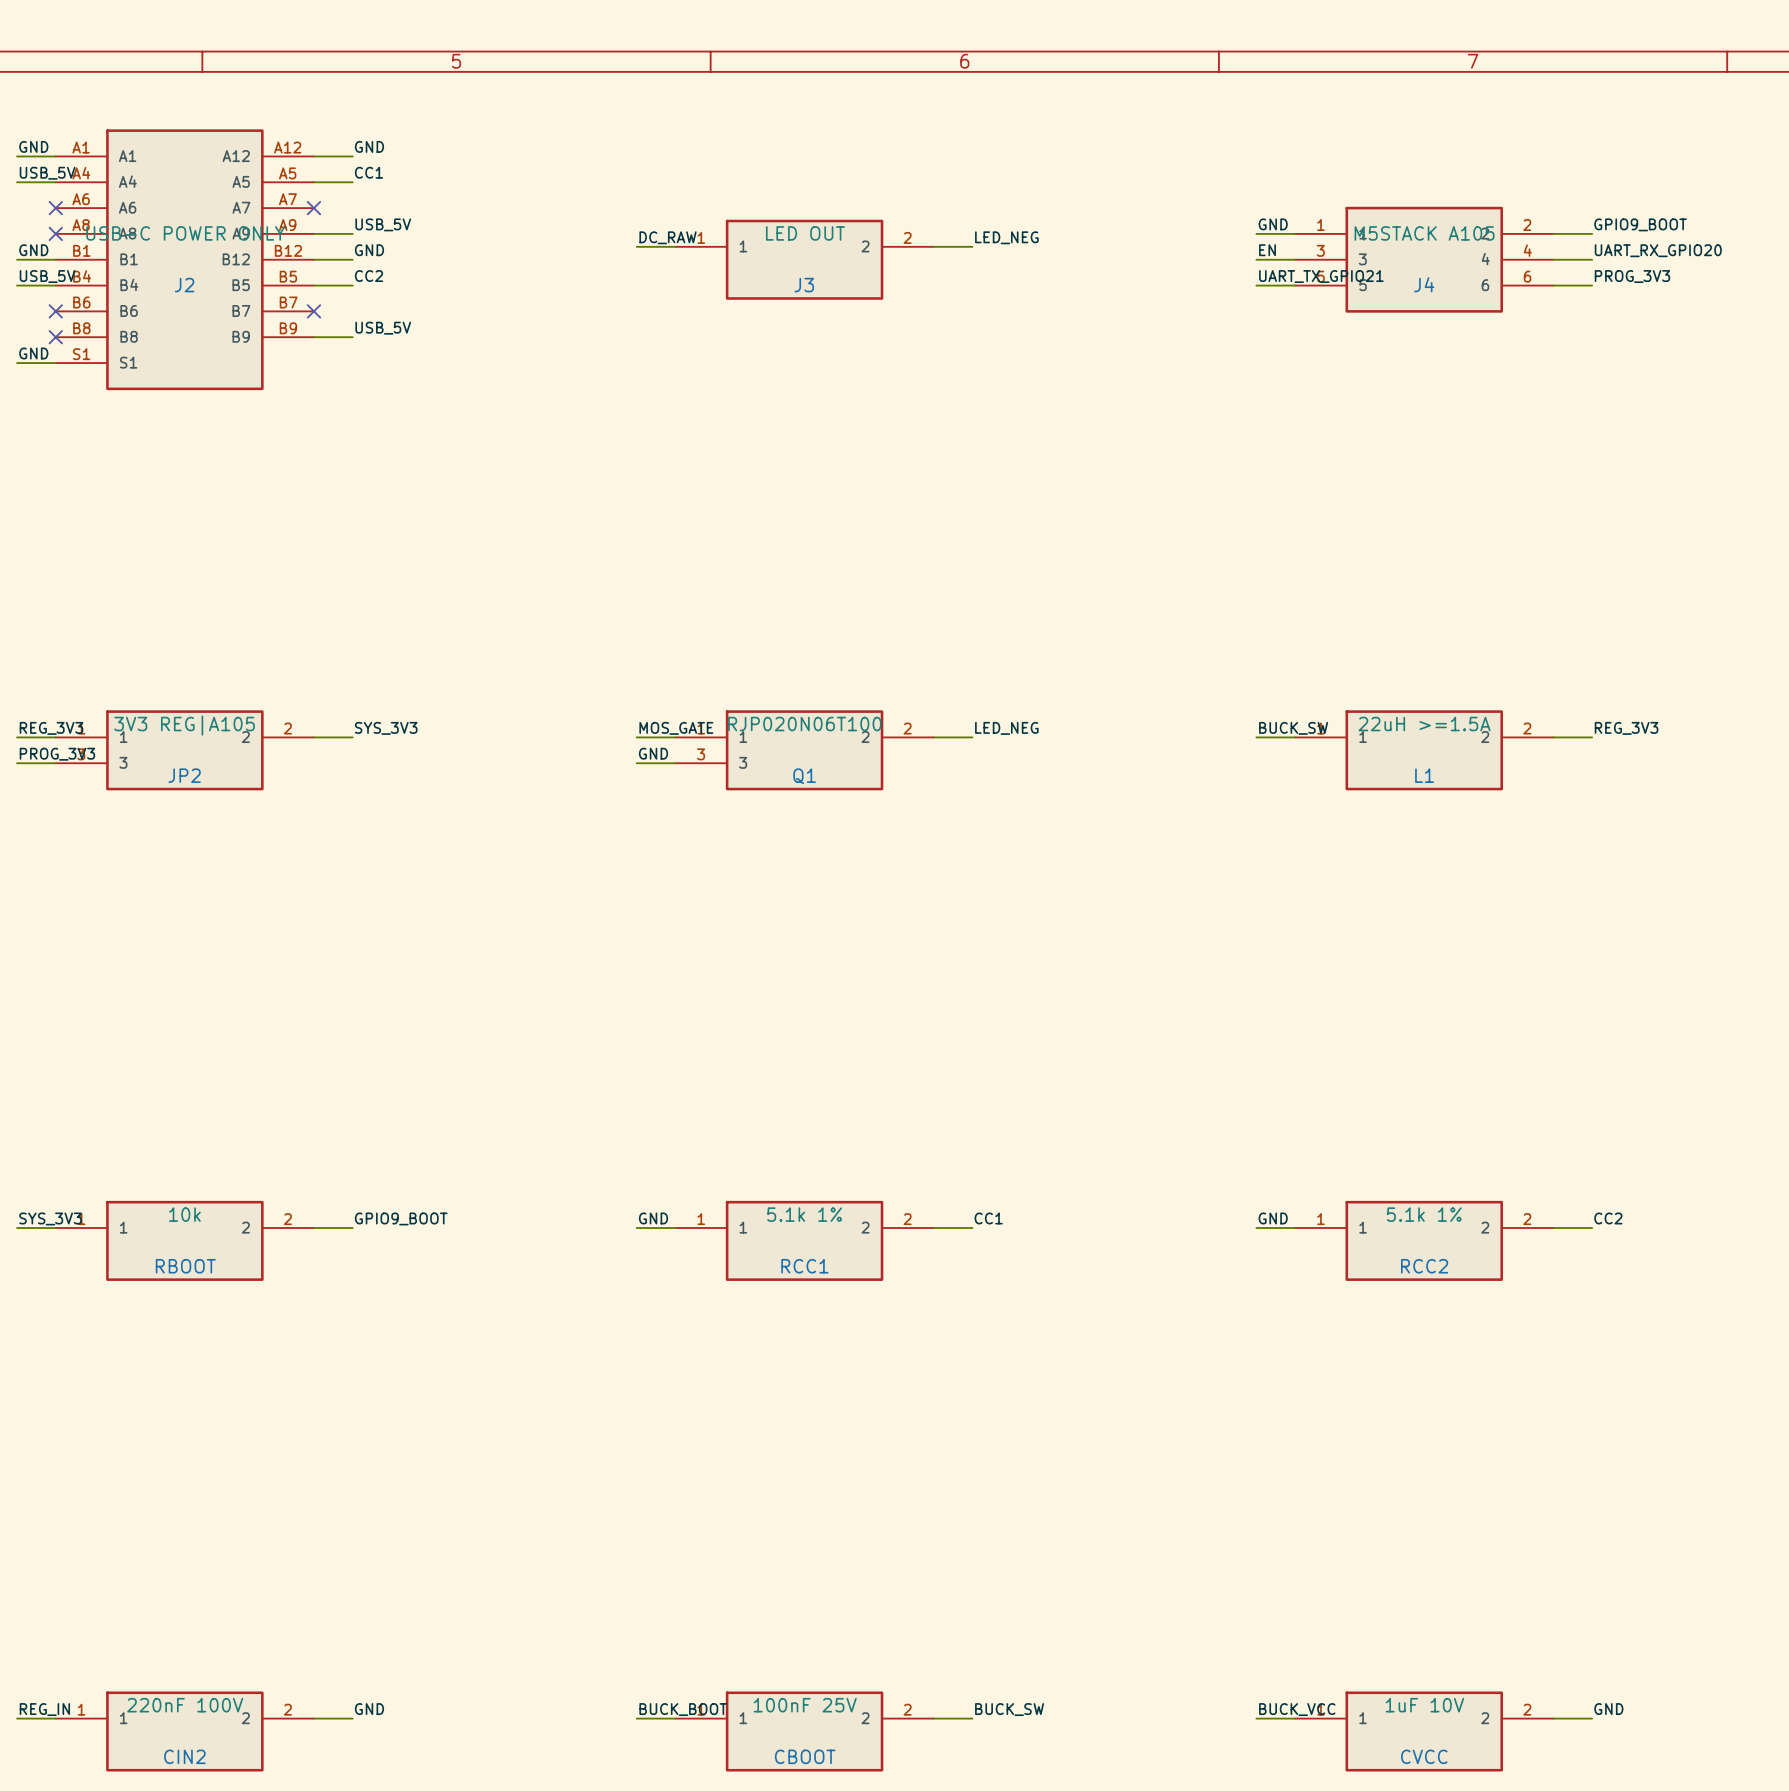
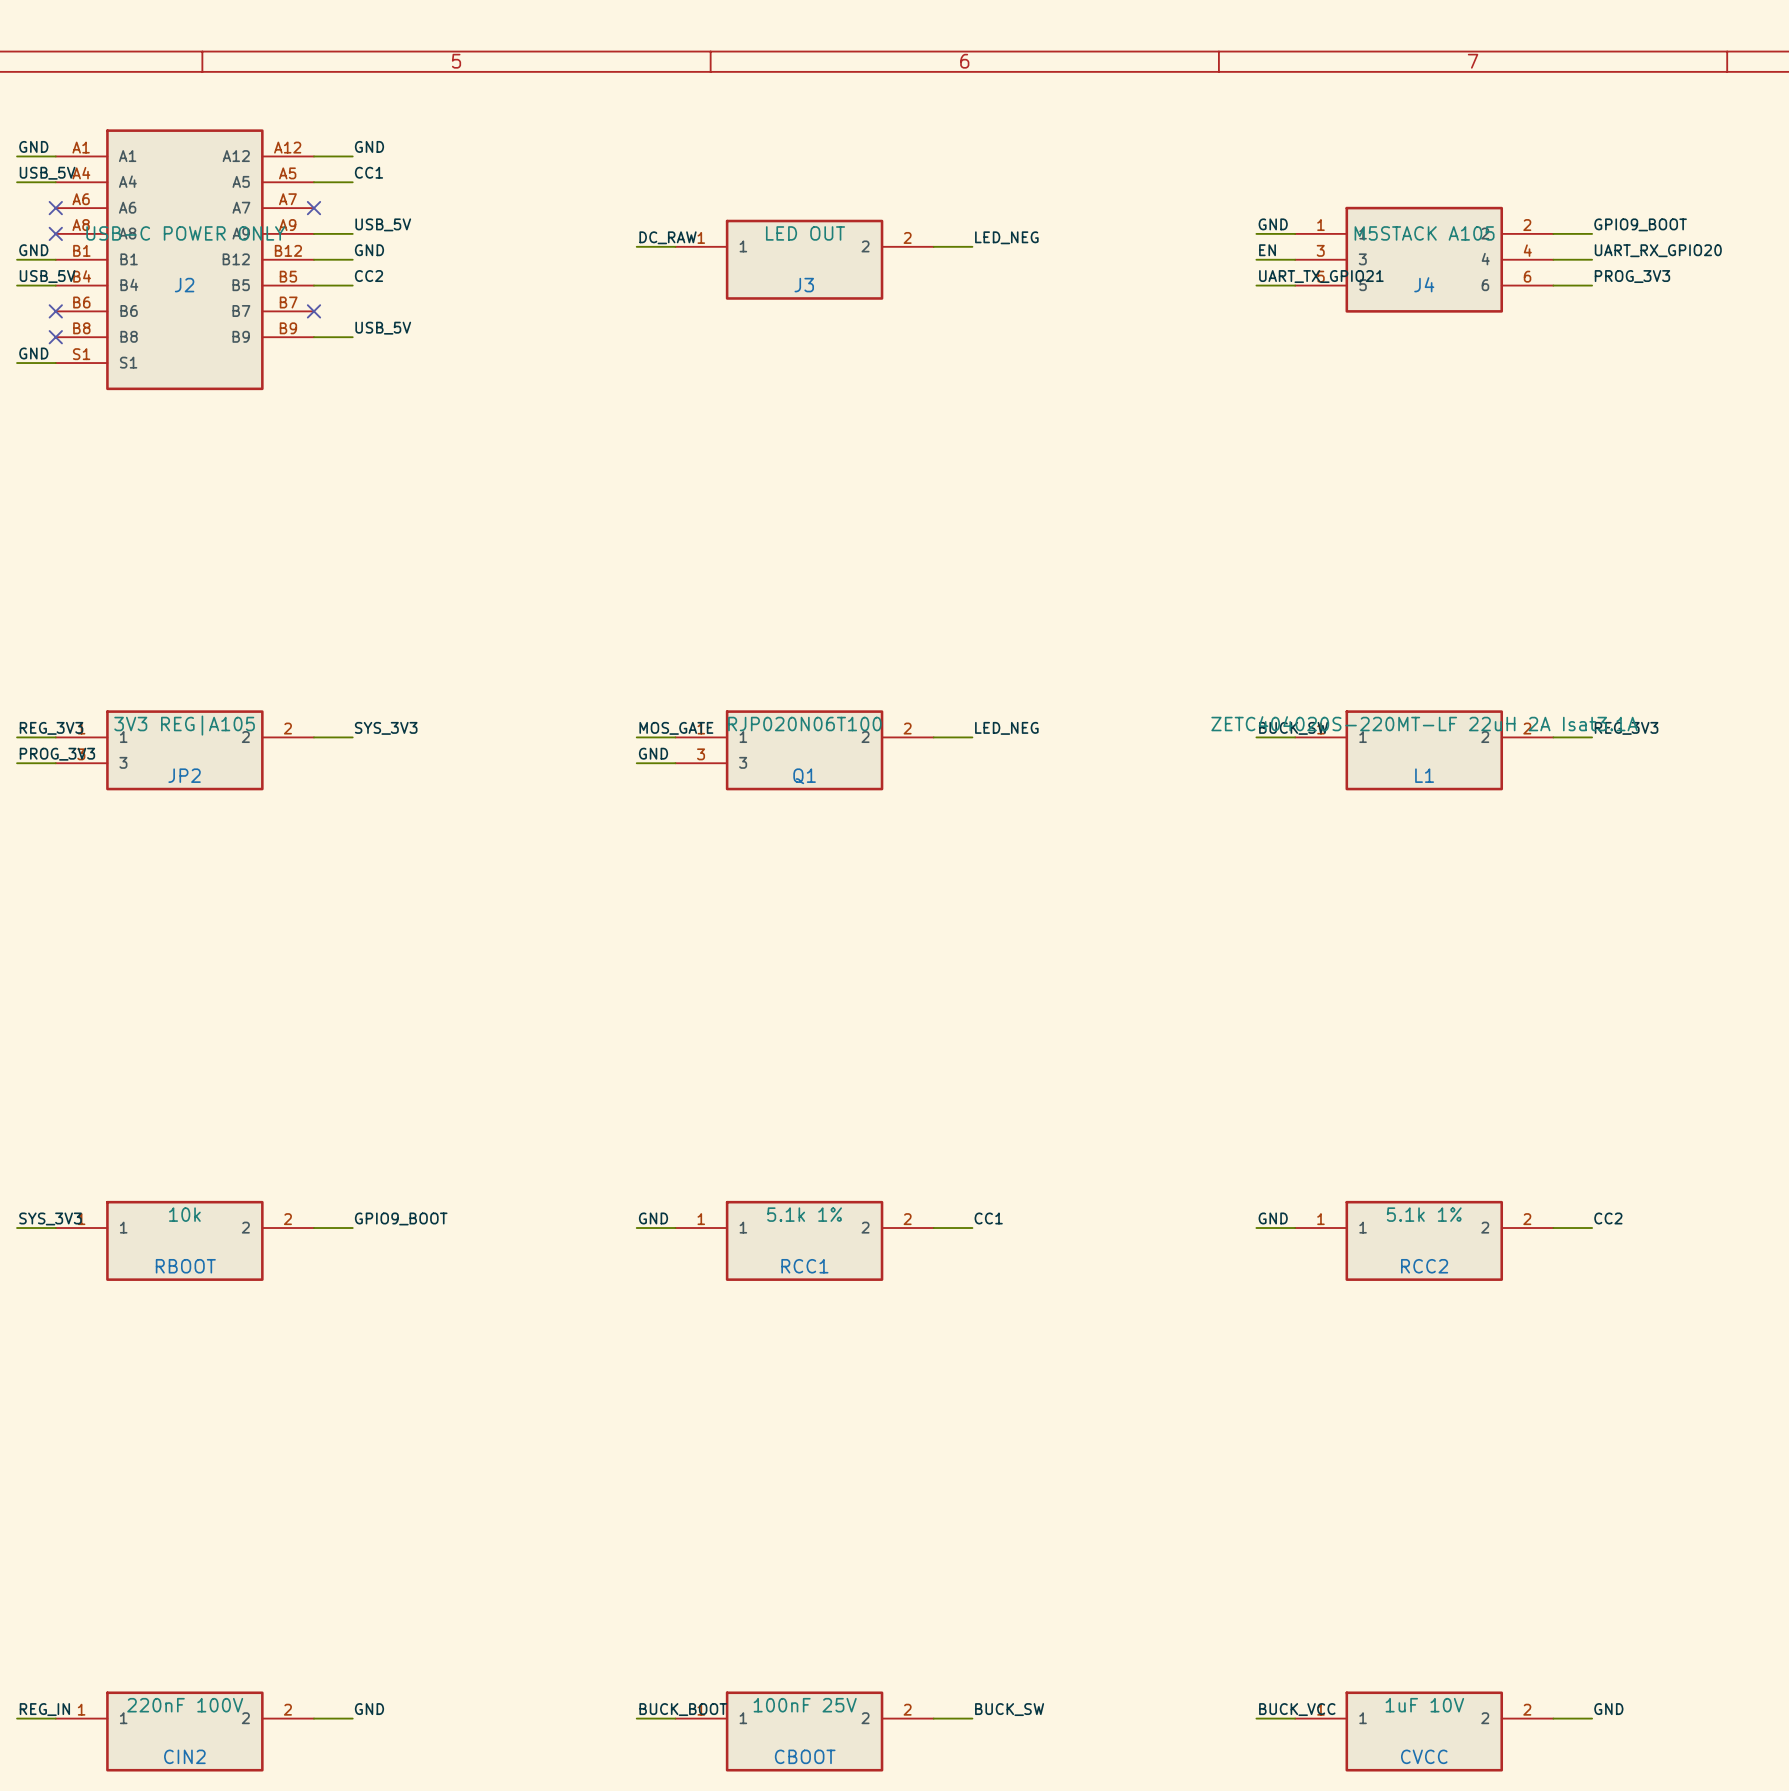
L1 value: 22uH >=1.5A (1424, 724) -> ZETC404020S-220MT-LF 22uH 2A Isat3.1A (1424, 723)

